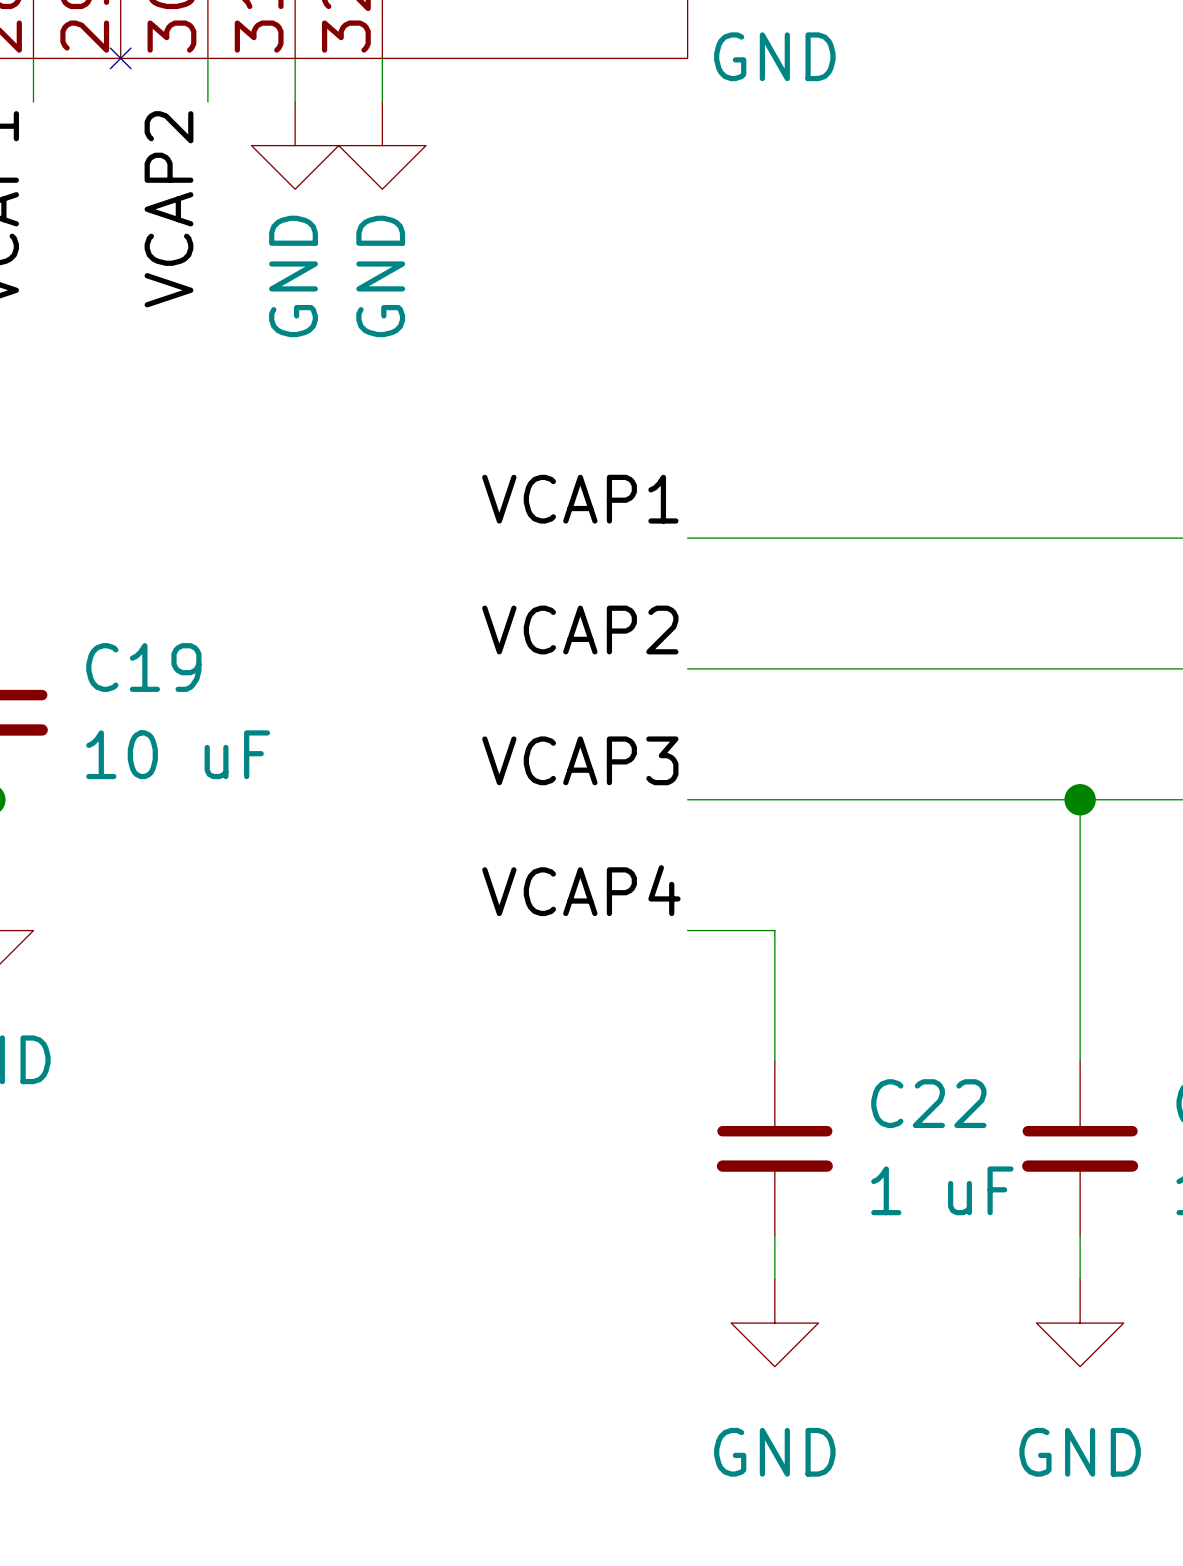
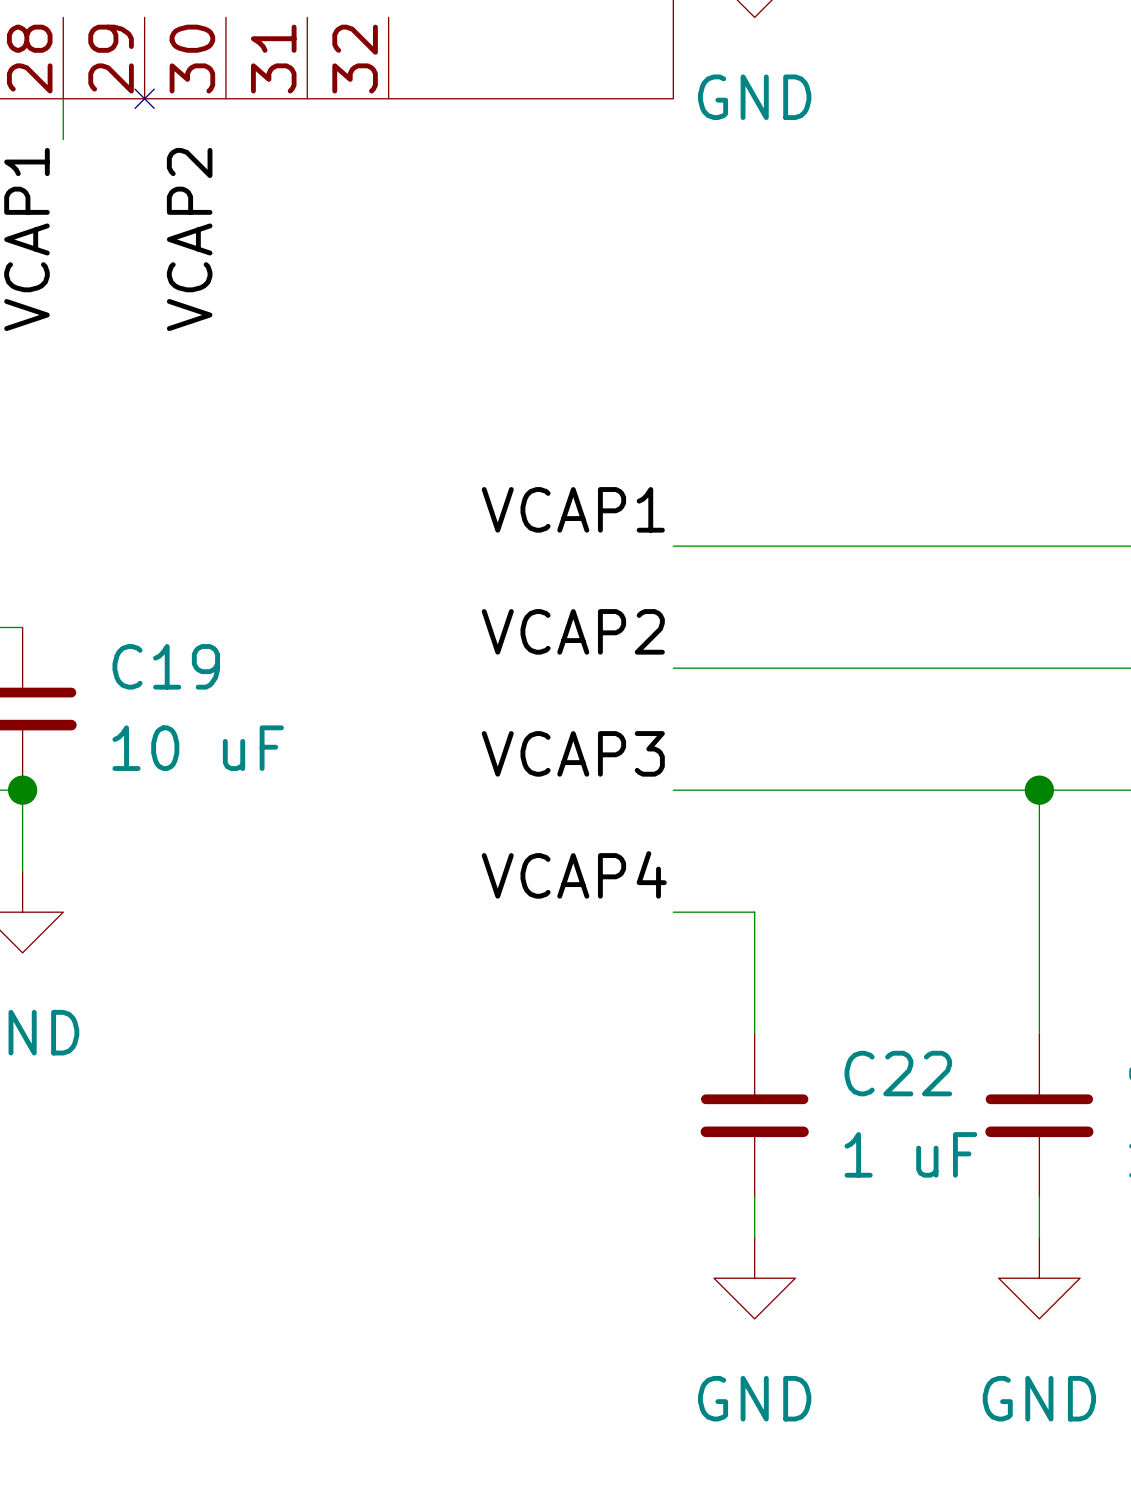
wire: (207, 58) (207, 102) -> none
wire: (295, 58) (295, 102) -> none
wire: (382, 58) (382, 102) -> none
power symbol: GND (295, 145) -> none
power symbol: GND (382, 145) -> none

